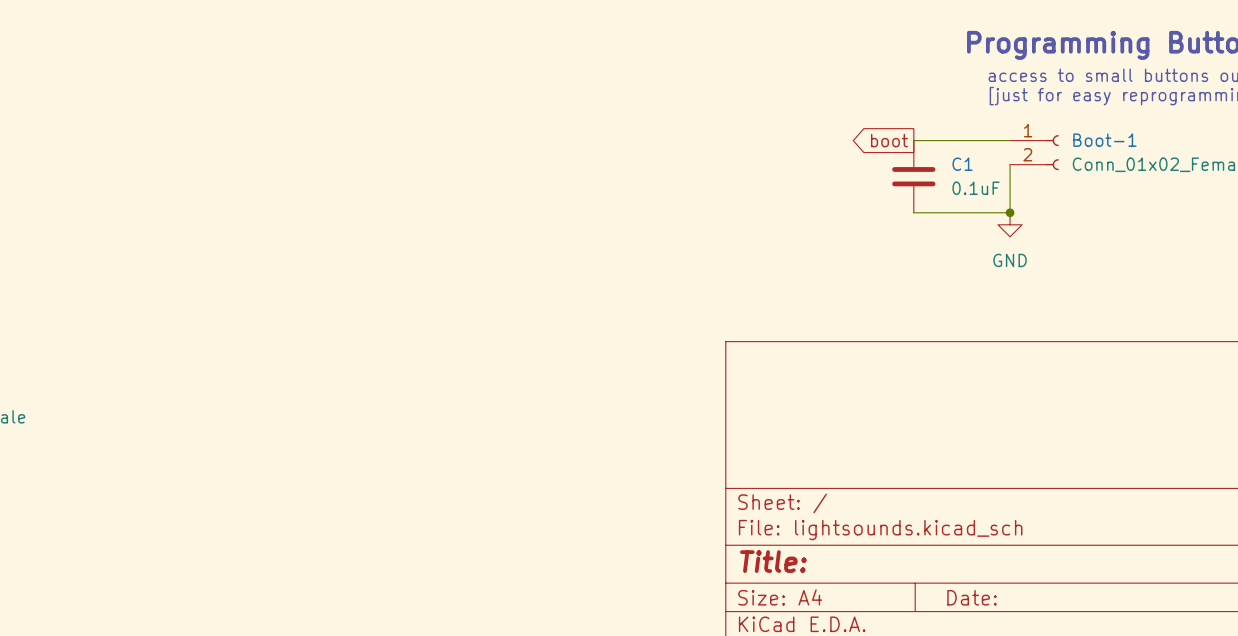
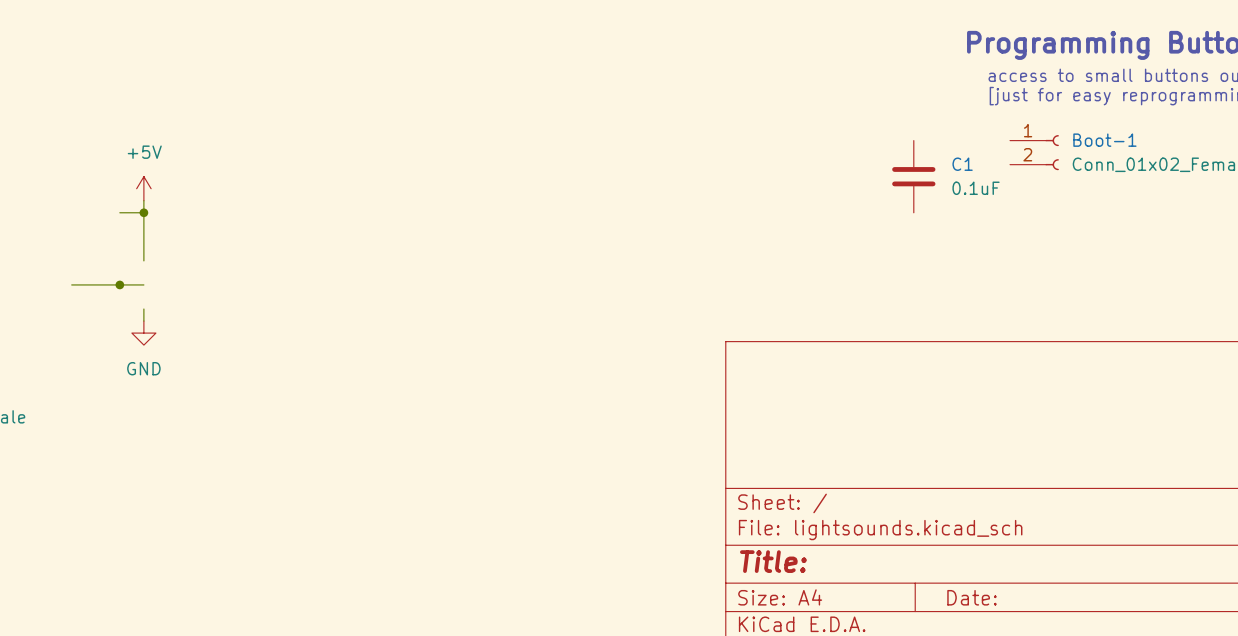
global label: boot (889, 140) -> none
wire: (913, 140) (1010, 140) -> none
wire: (1010, 164) (1010, 212) (913, 212) -> none
power symbol: none -> +5V (143, 188)
wire: none -> (143, 200) (143, 260)
wire: none -> (119, 212) (143, 212)
junction: none -> (143, 212)
junction: (1010, 212) -> none
power symbol: GND (1010, 224) -> none
wire: none -> (71, 284) (143, 284)
junction: none -> (119, 284)
wire: none -> (143, 309) (143, 321)
power symbol: none -> GND (143, 333)

